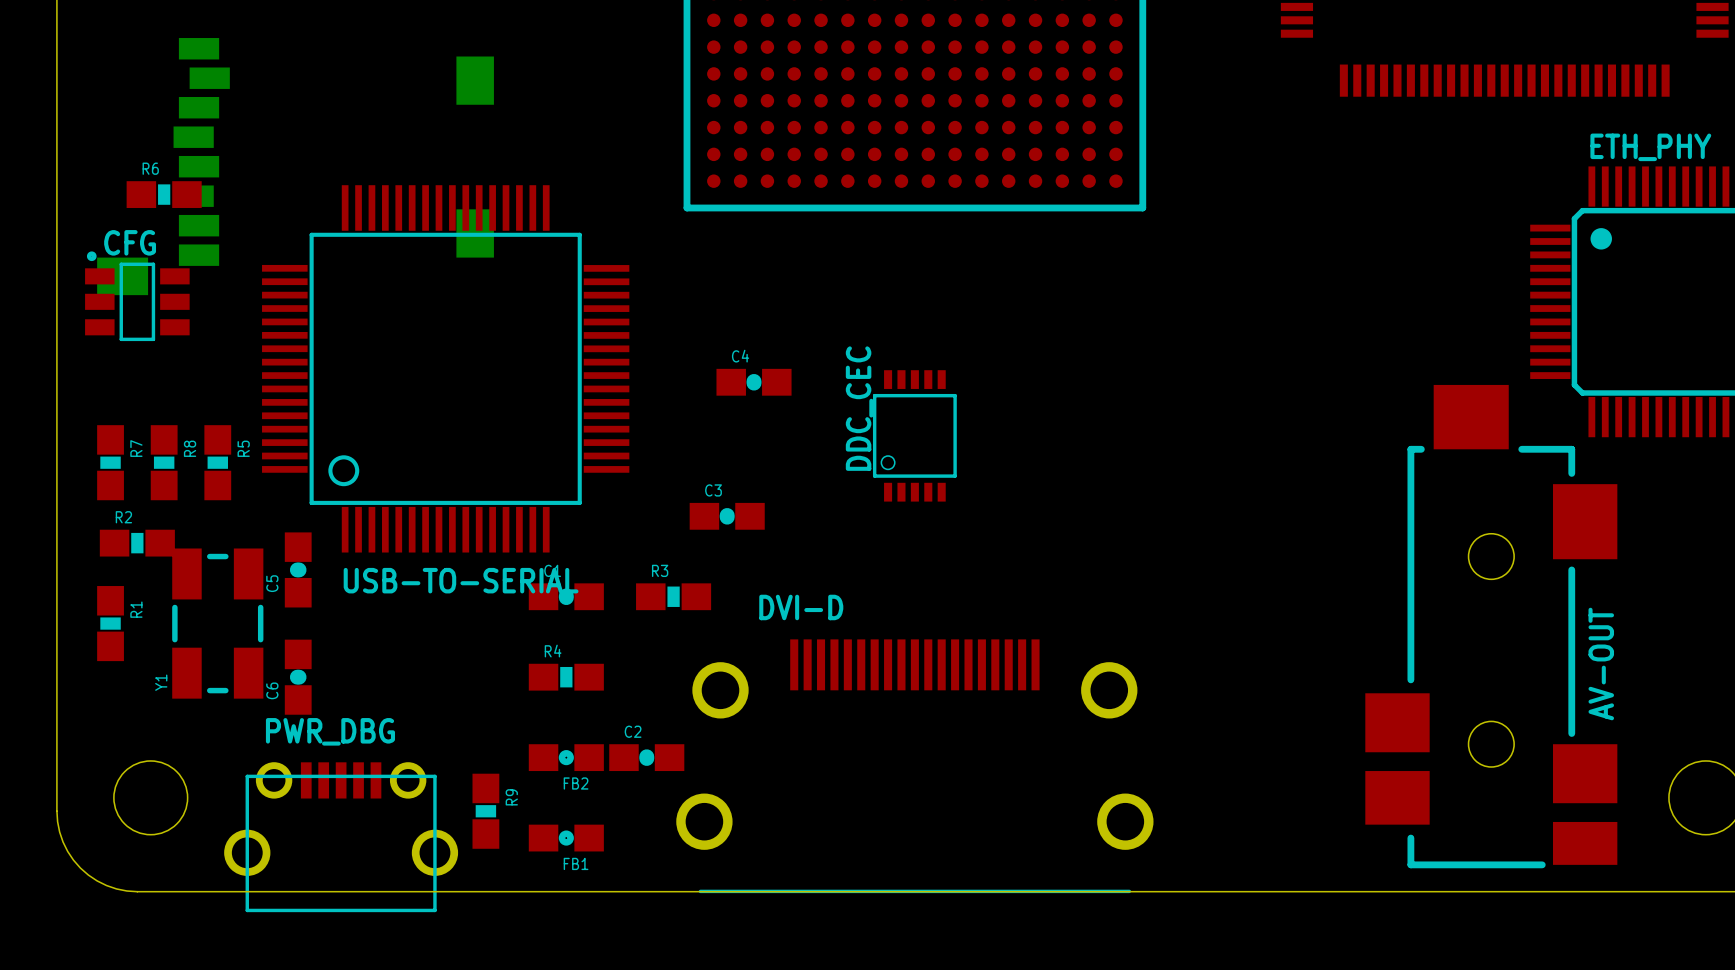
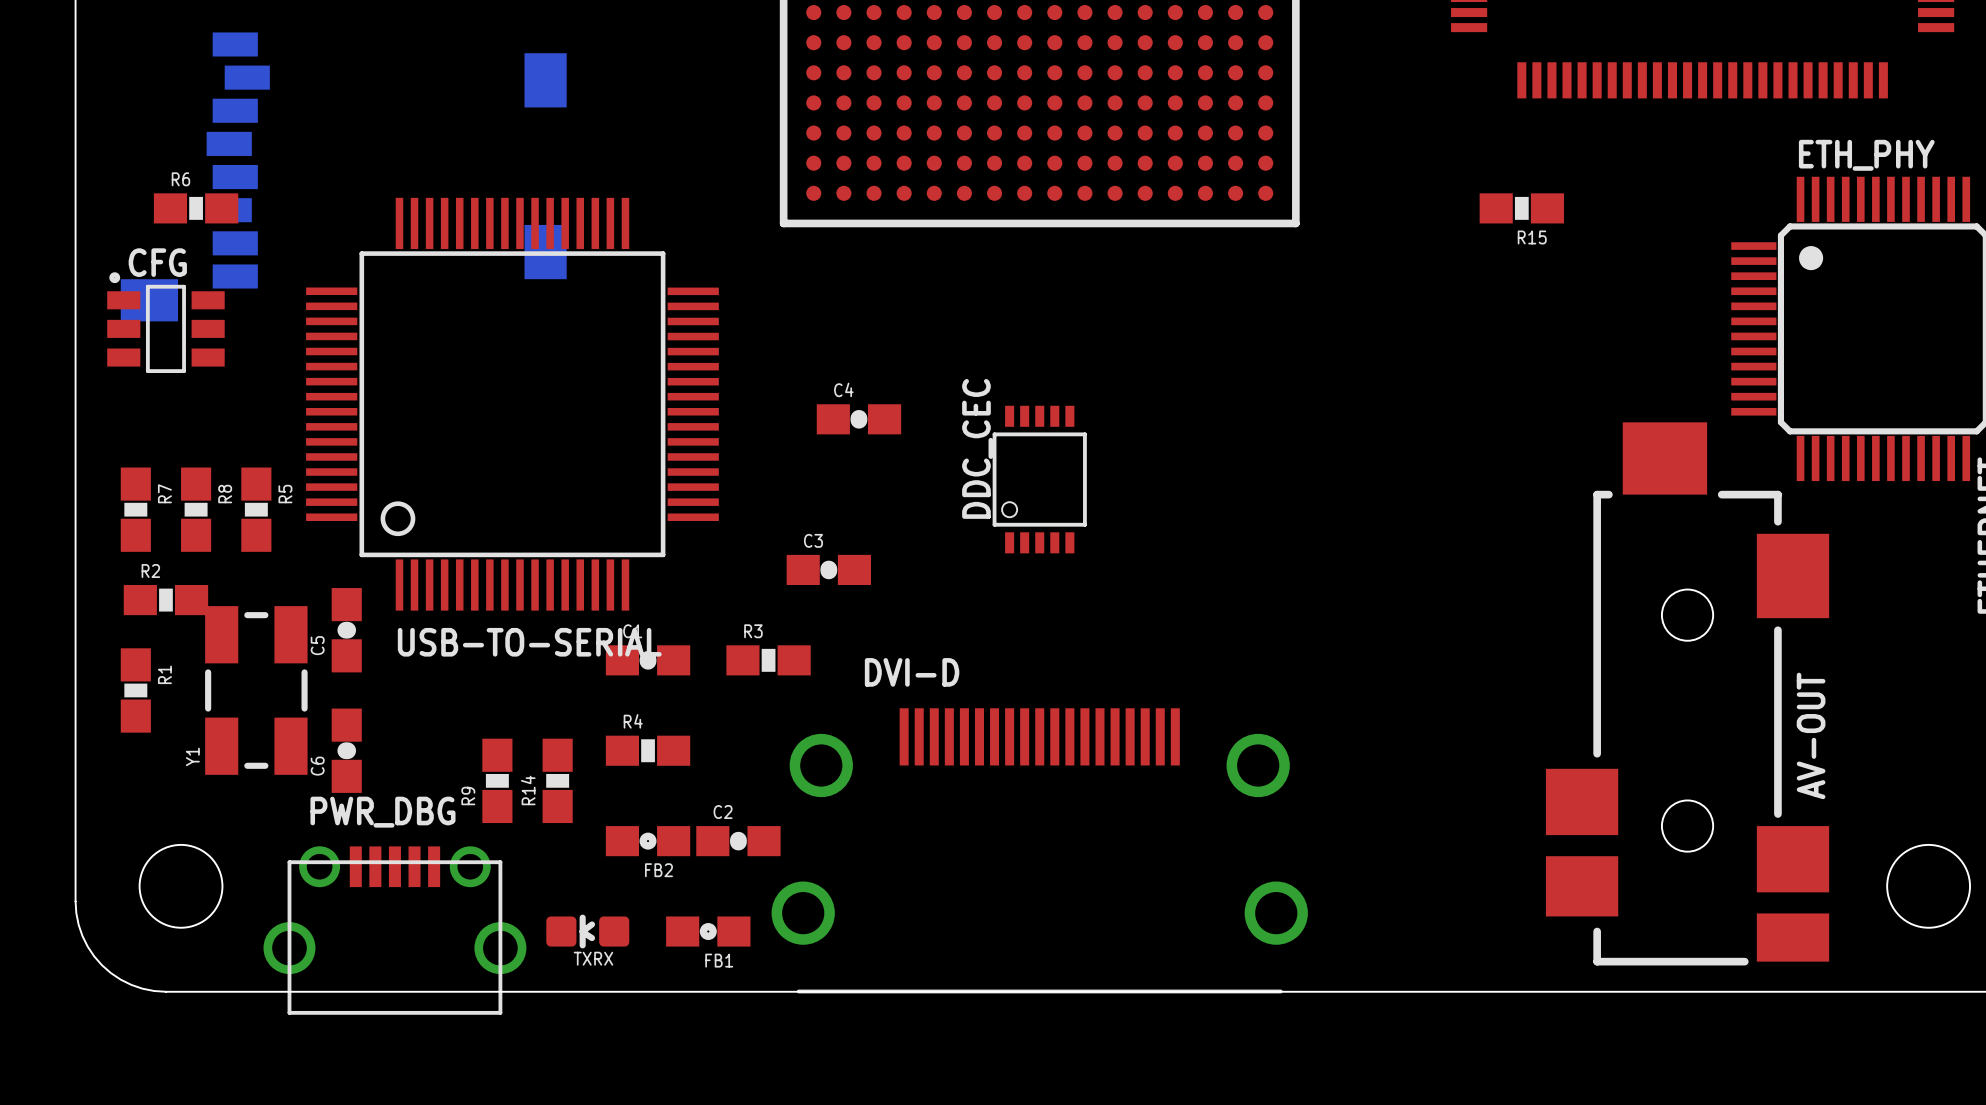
R15: none -> (1521, 208)
R14: none -> (557, 780)
R9 name position: R9 (511, 797) -> R9 (468, 795)
R9 position: (485, 811) -> (497, 780)
TXRX: none -> (587, 931)
FB1 position: (566, 838) -> (708, 931)

